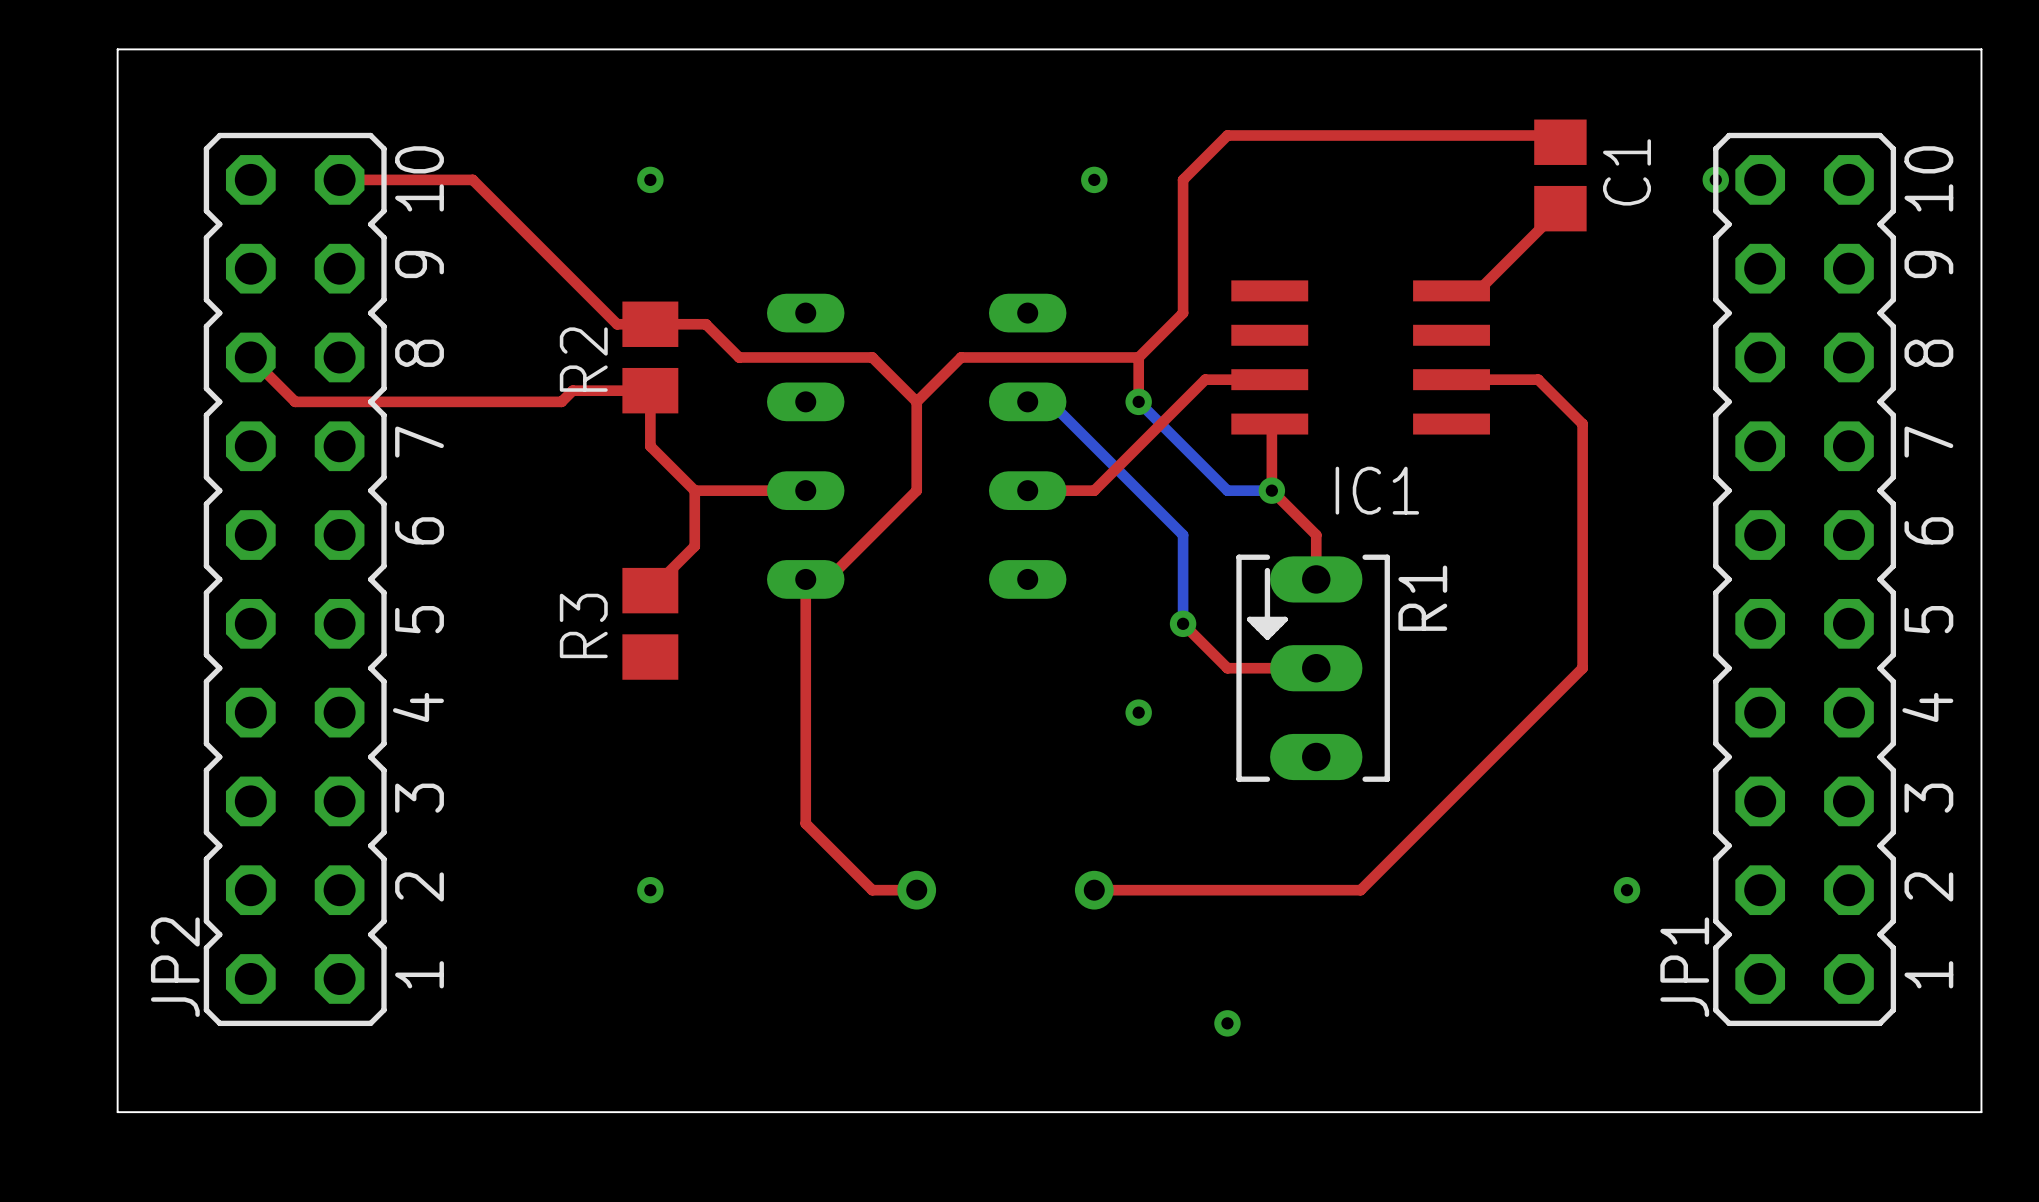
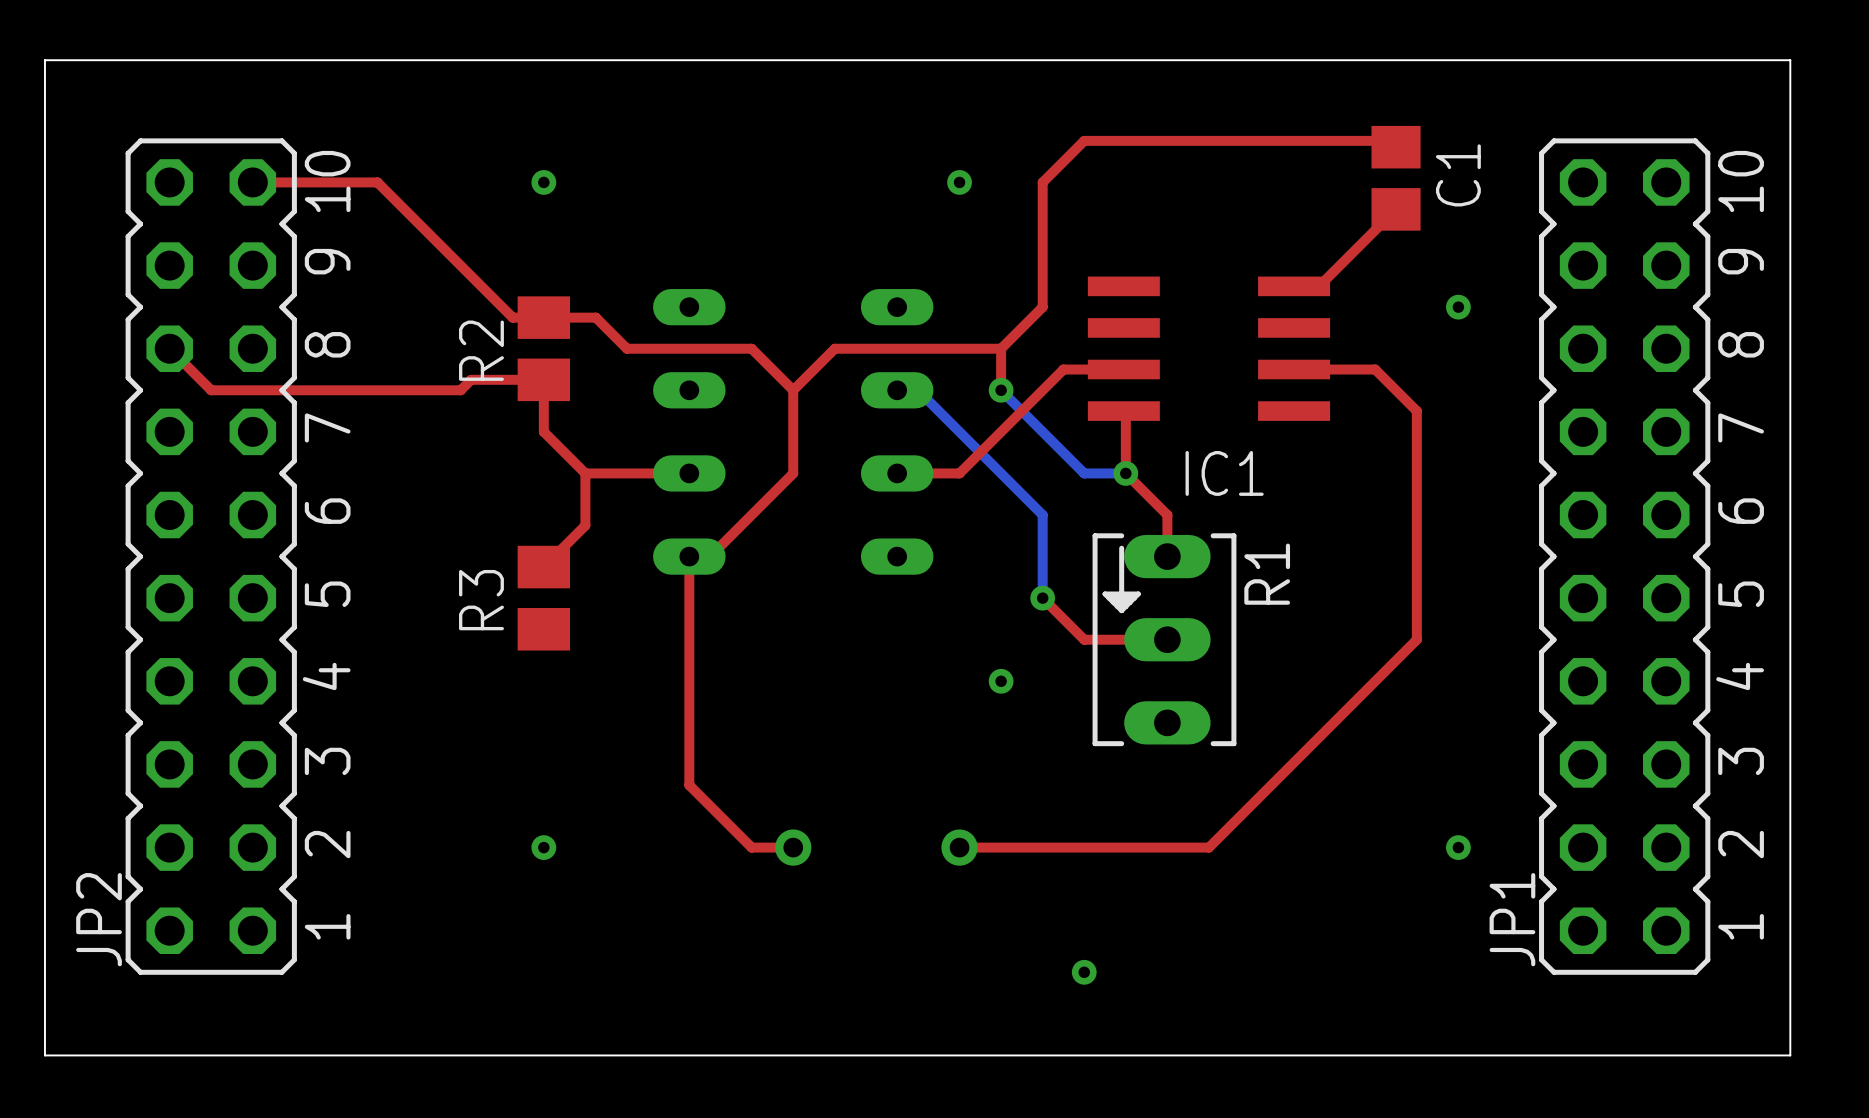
via position: (1715, 179) -> (1458, 307)

